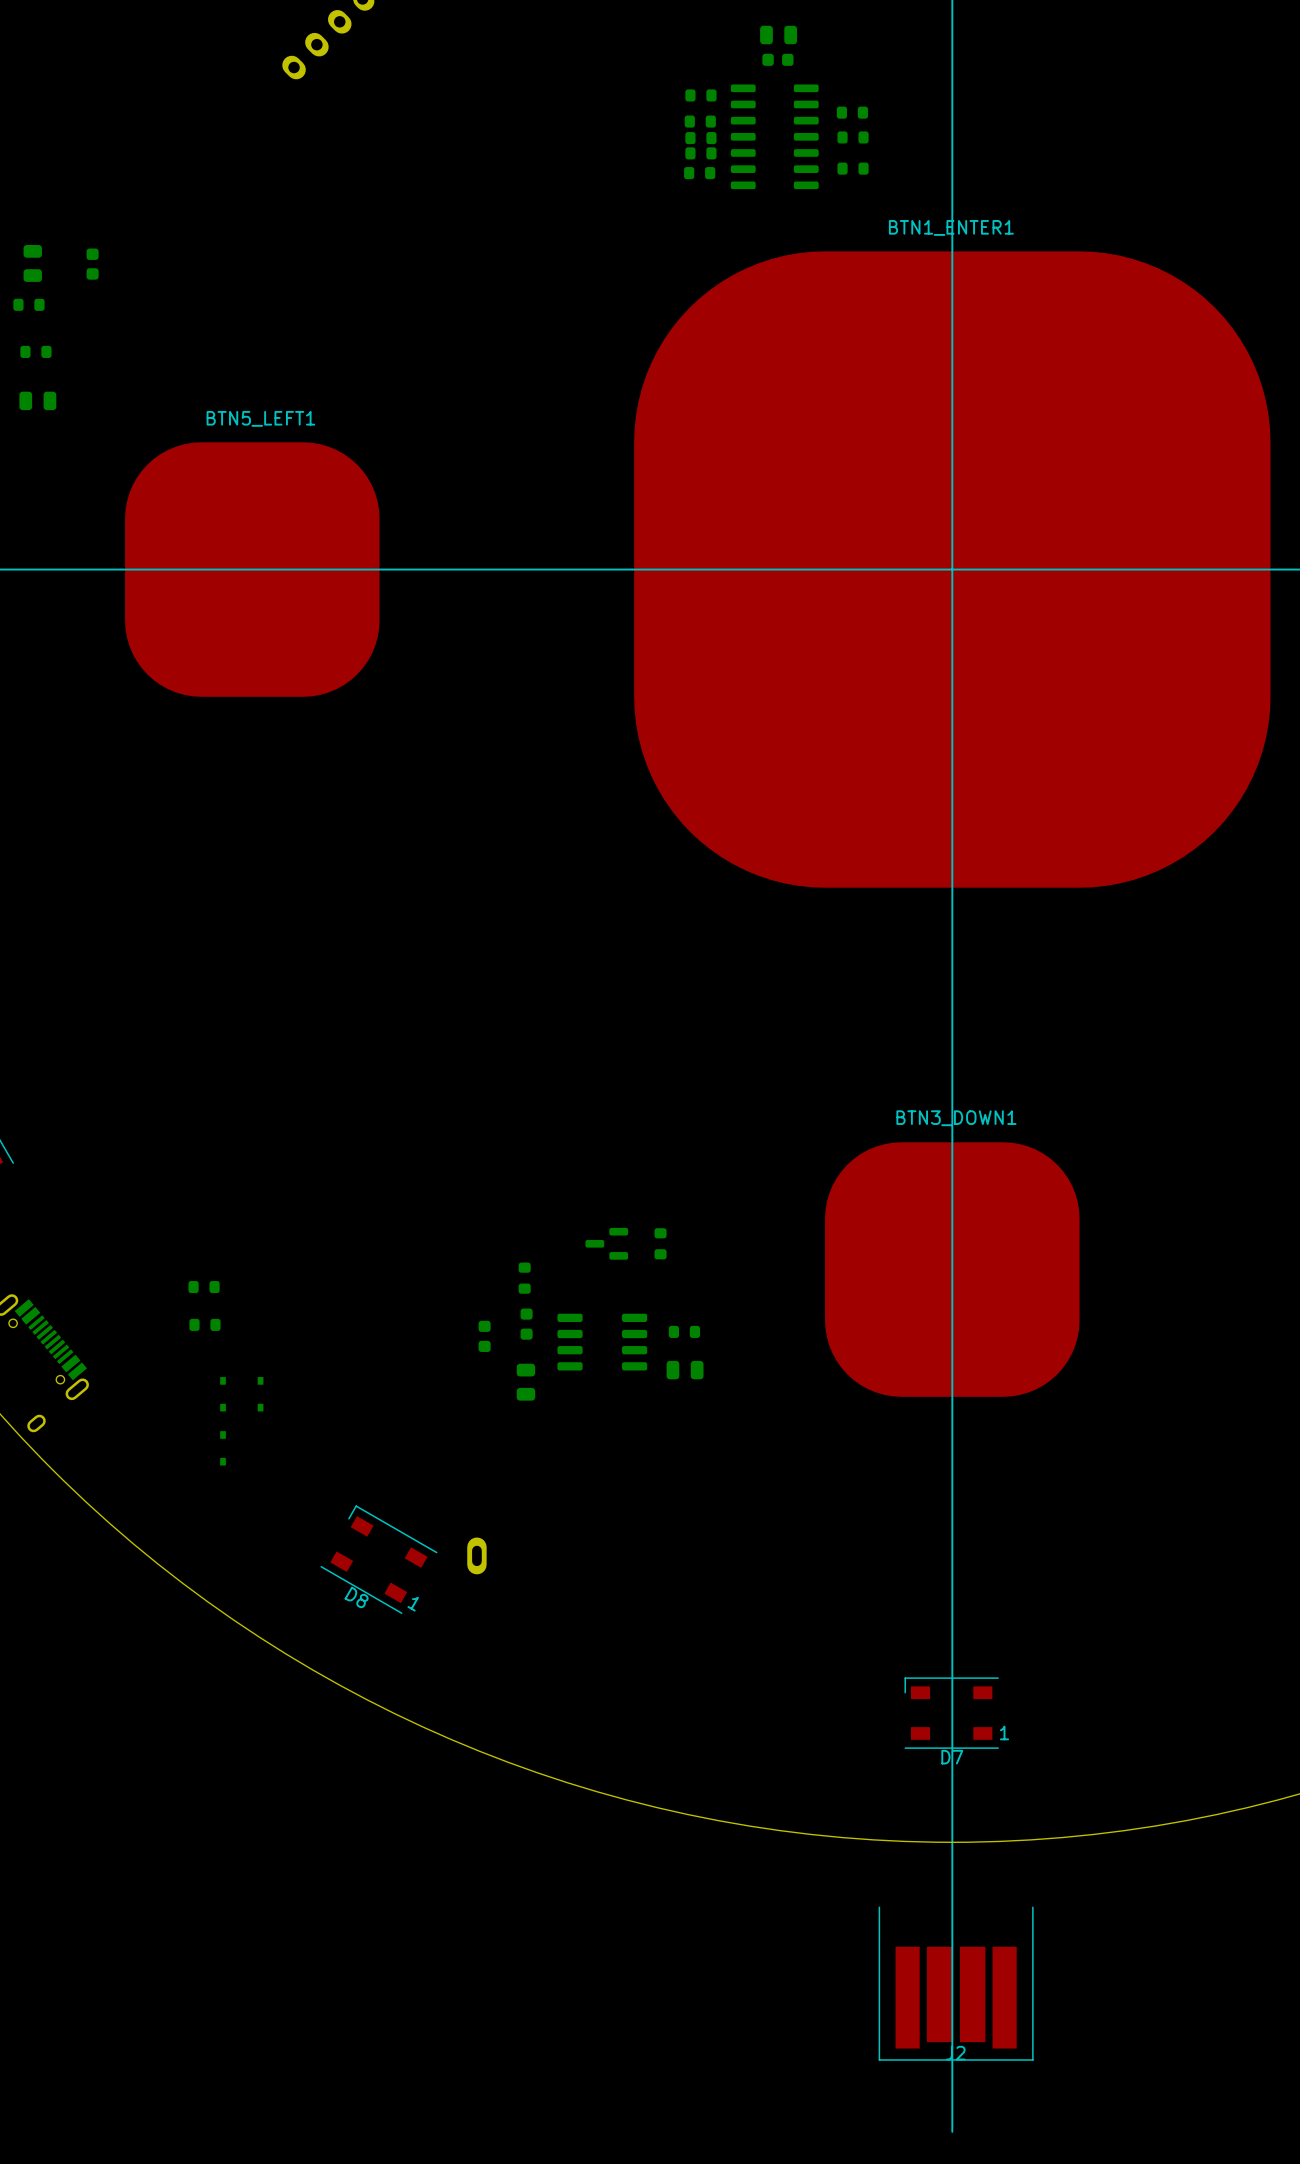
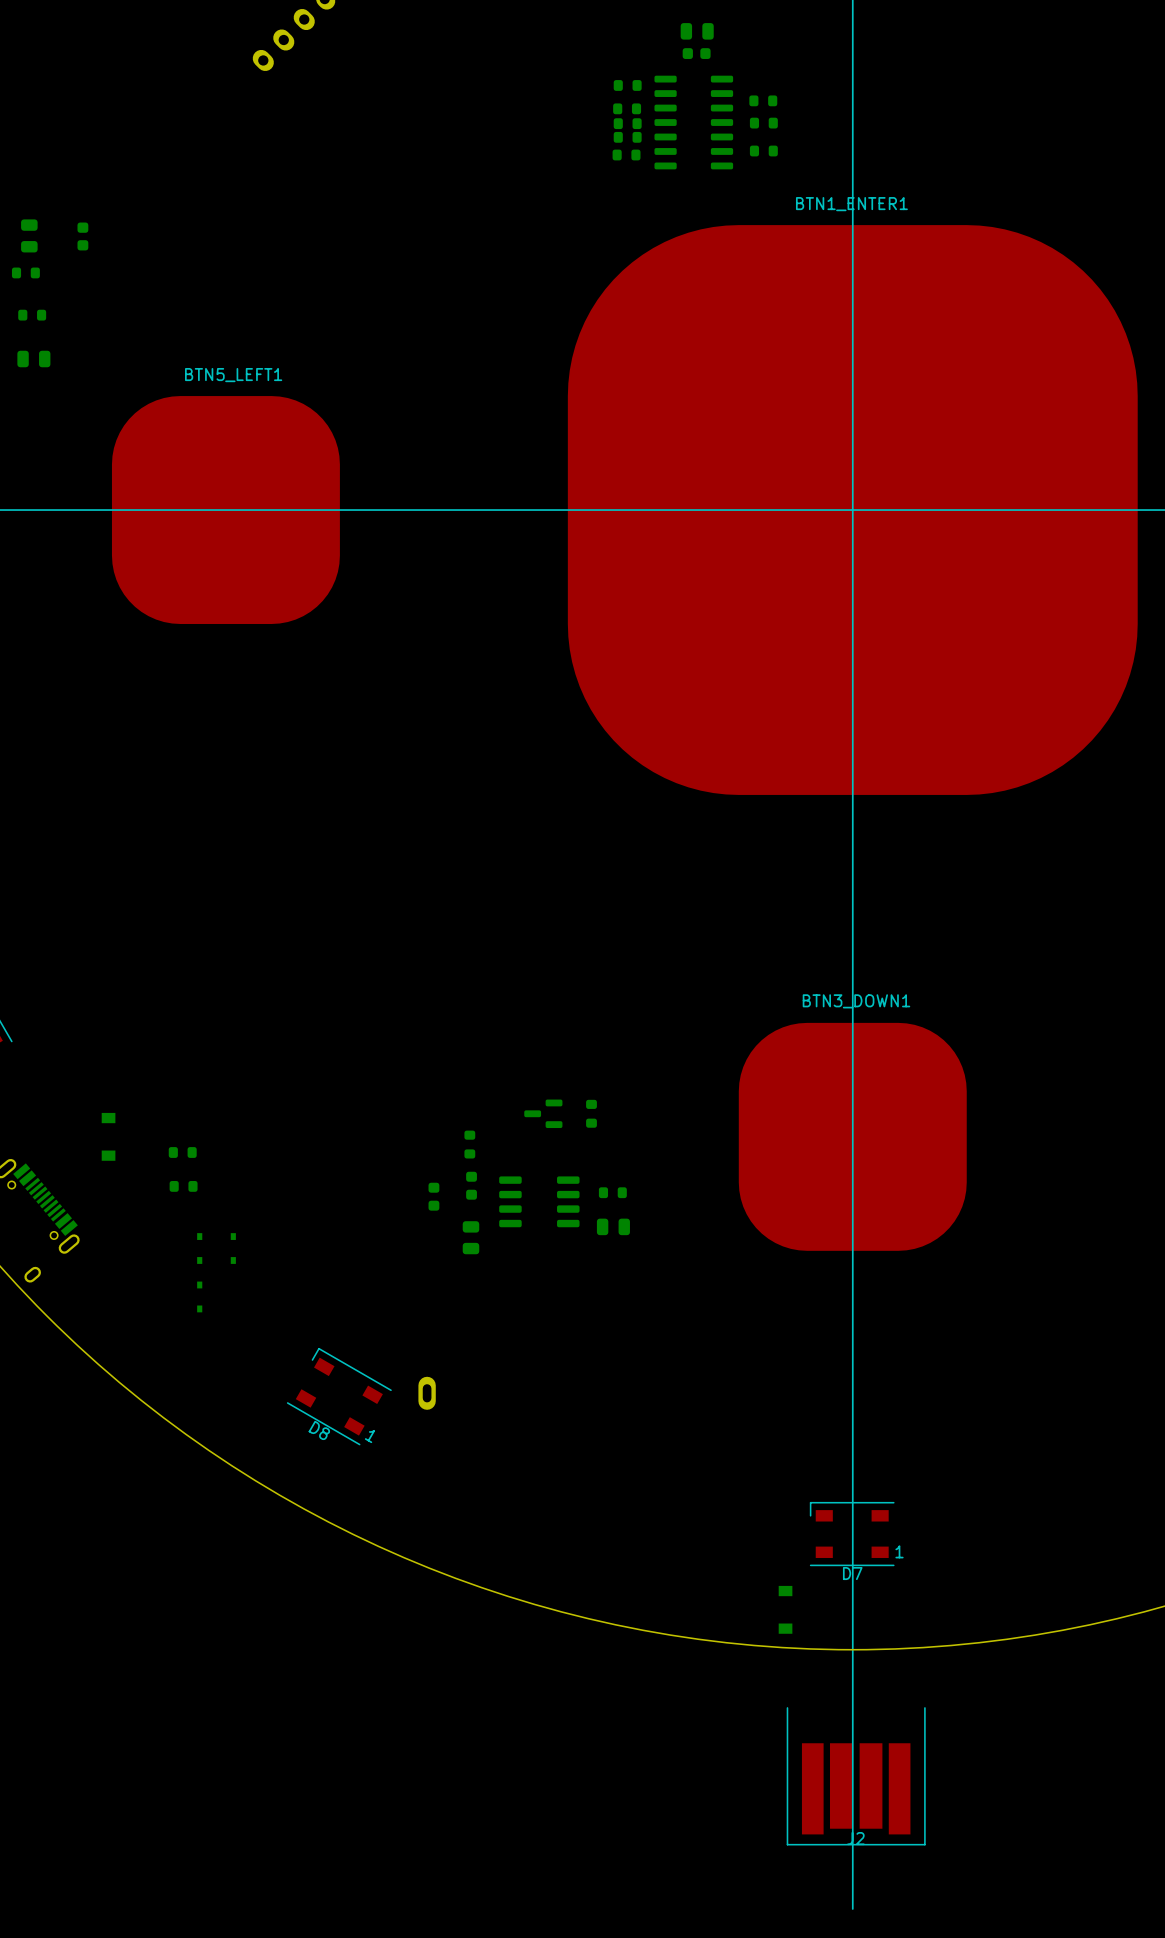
part: none -> (108, 1136)
part: none -> (785, 1609)

